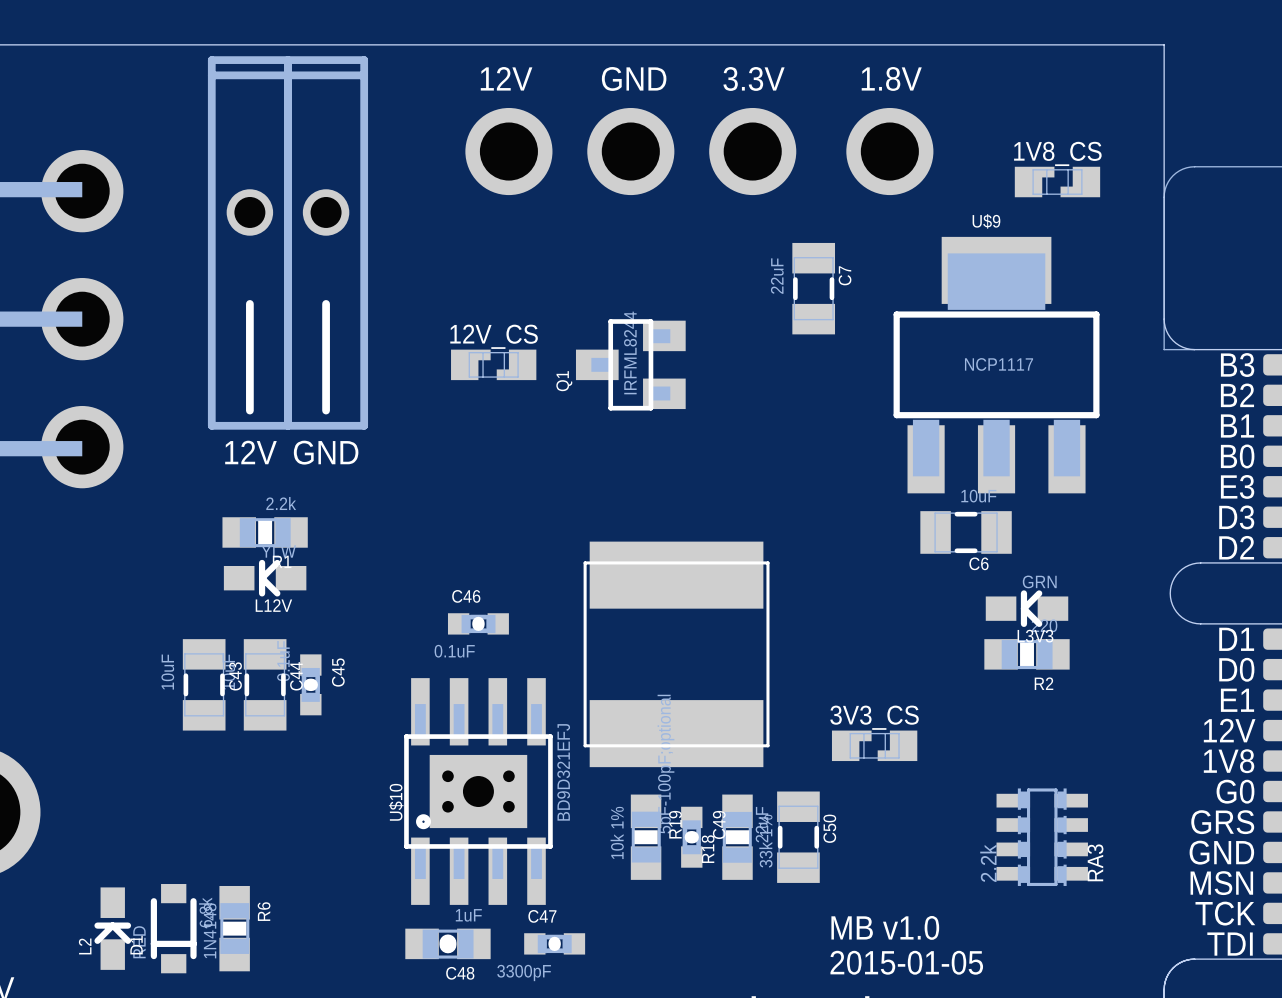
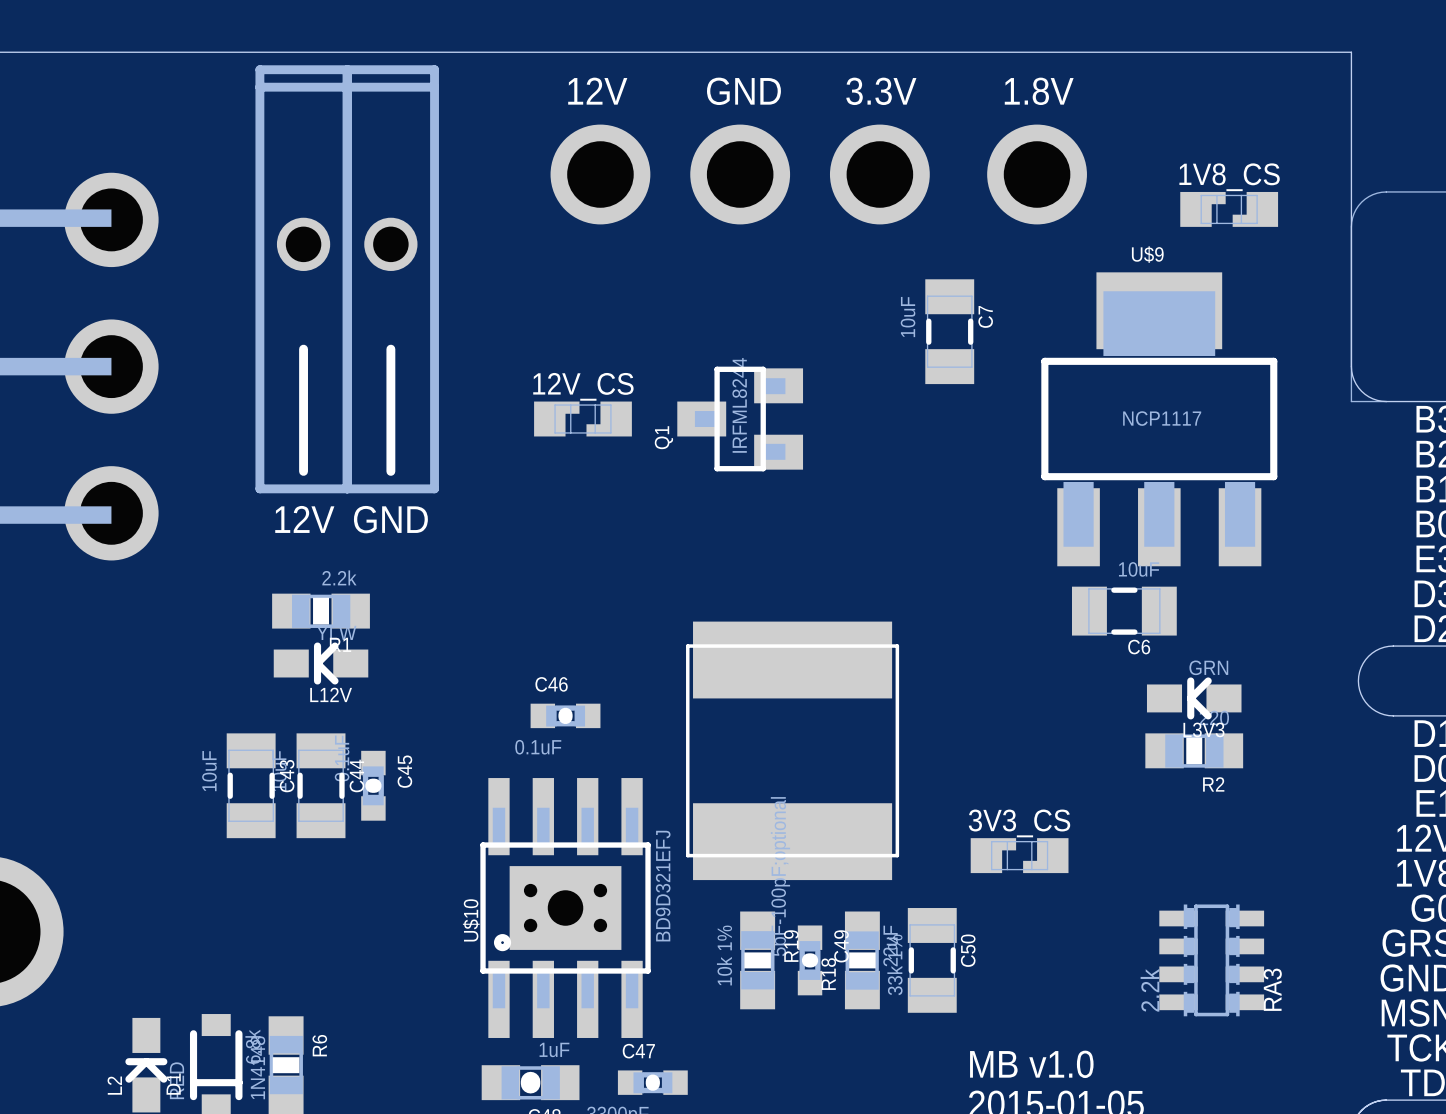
C7 value: 22uF (777, 276) -> 10uF (908, 317)

